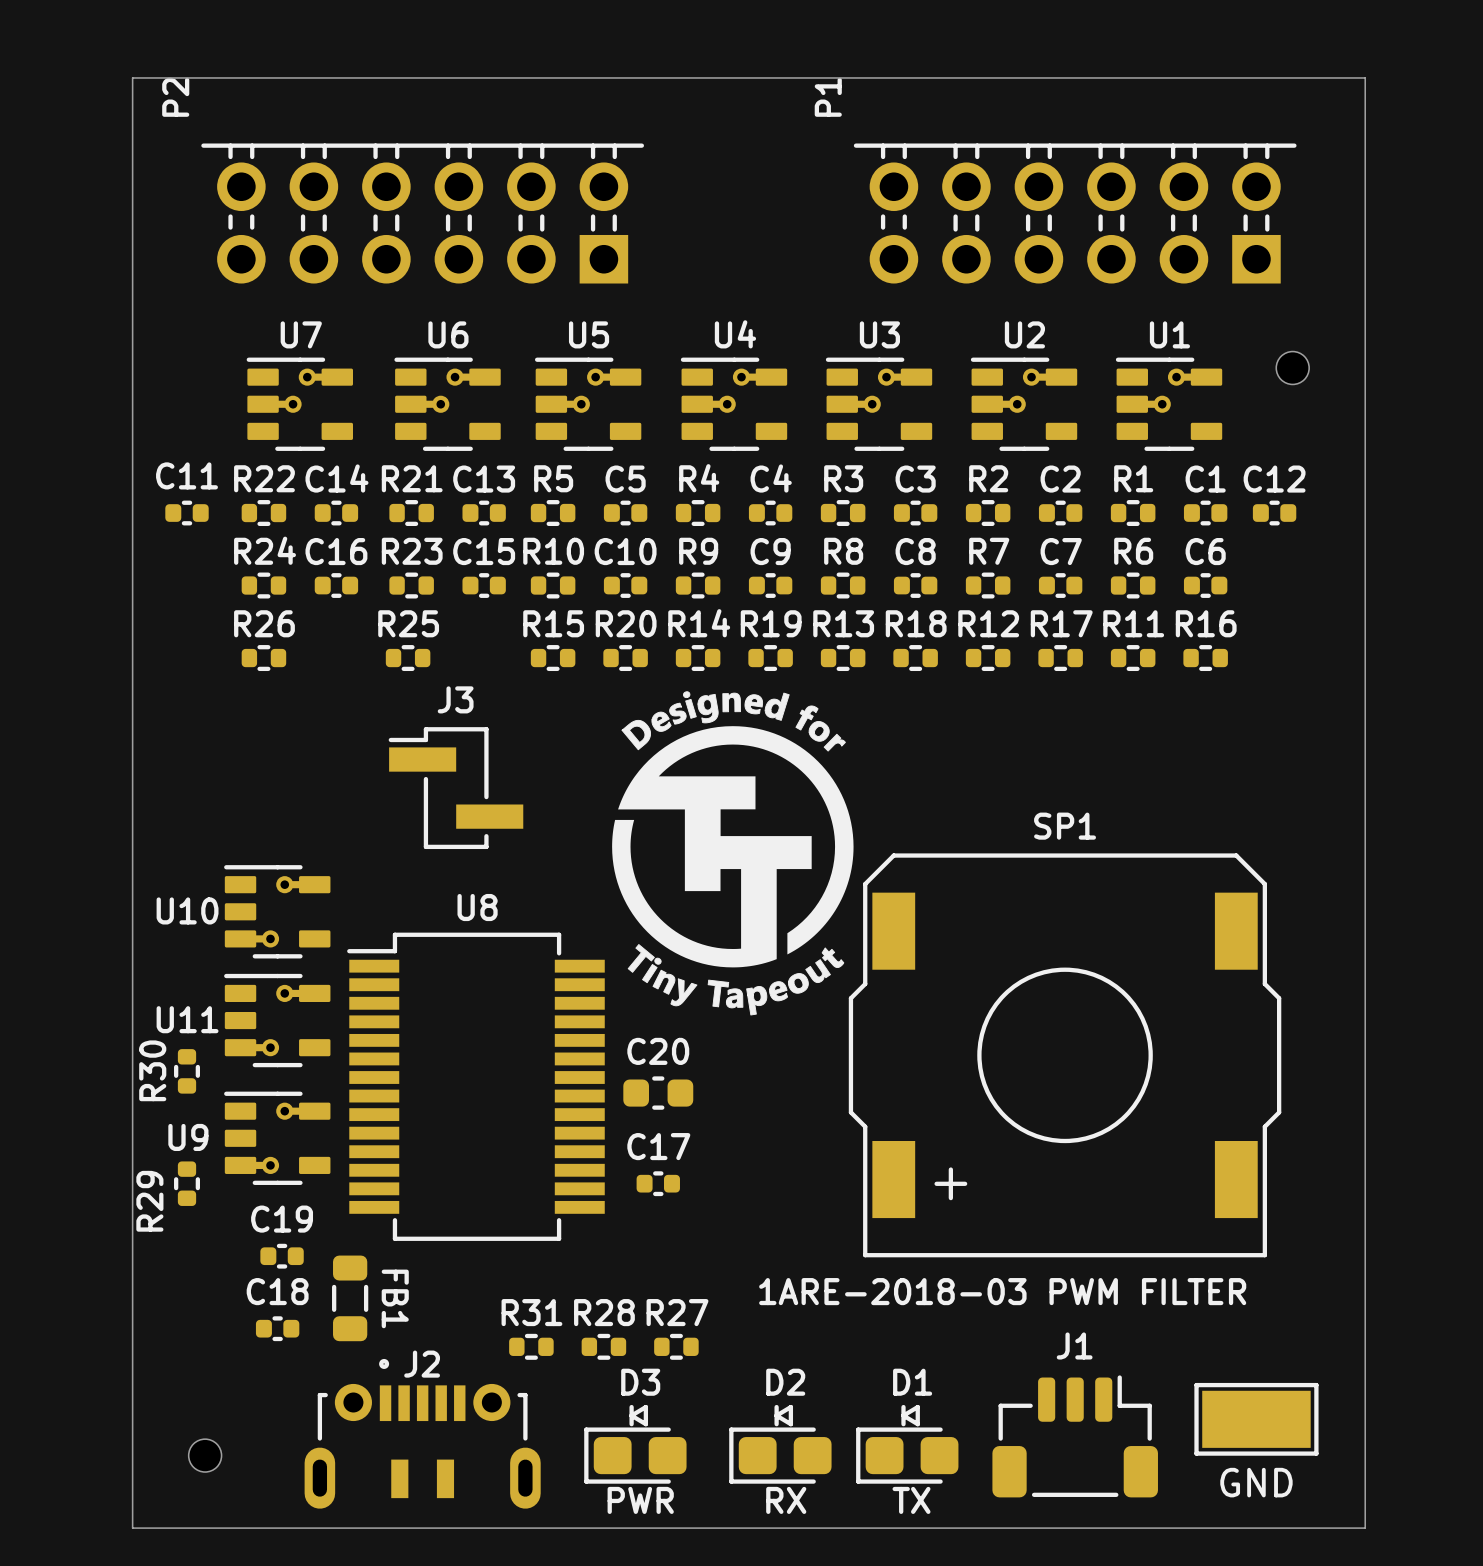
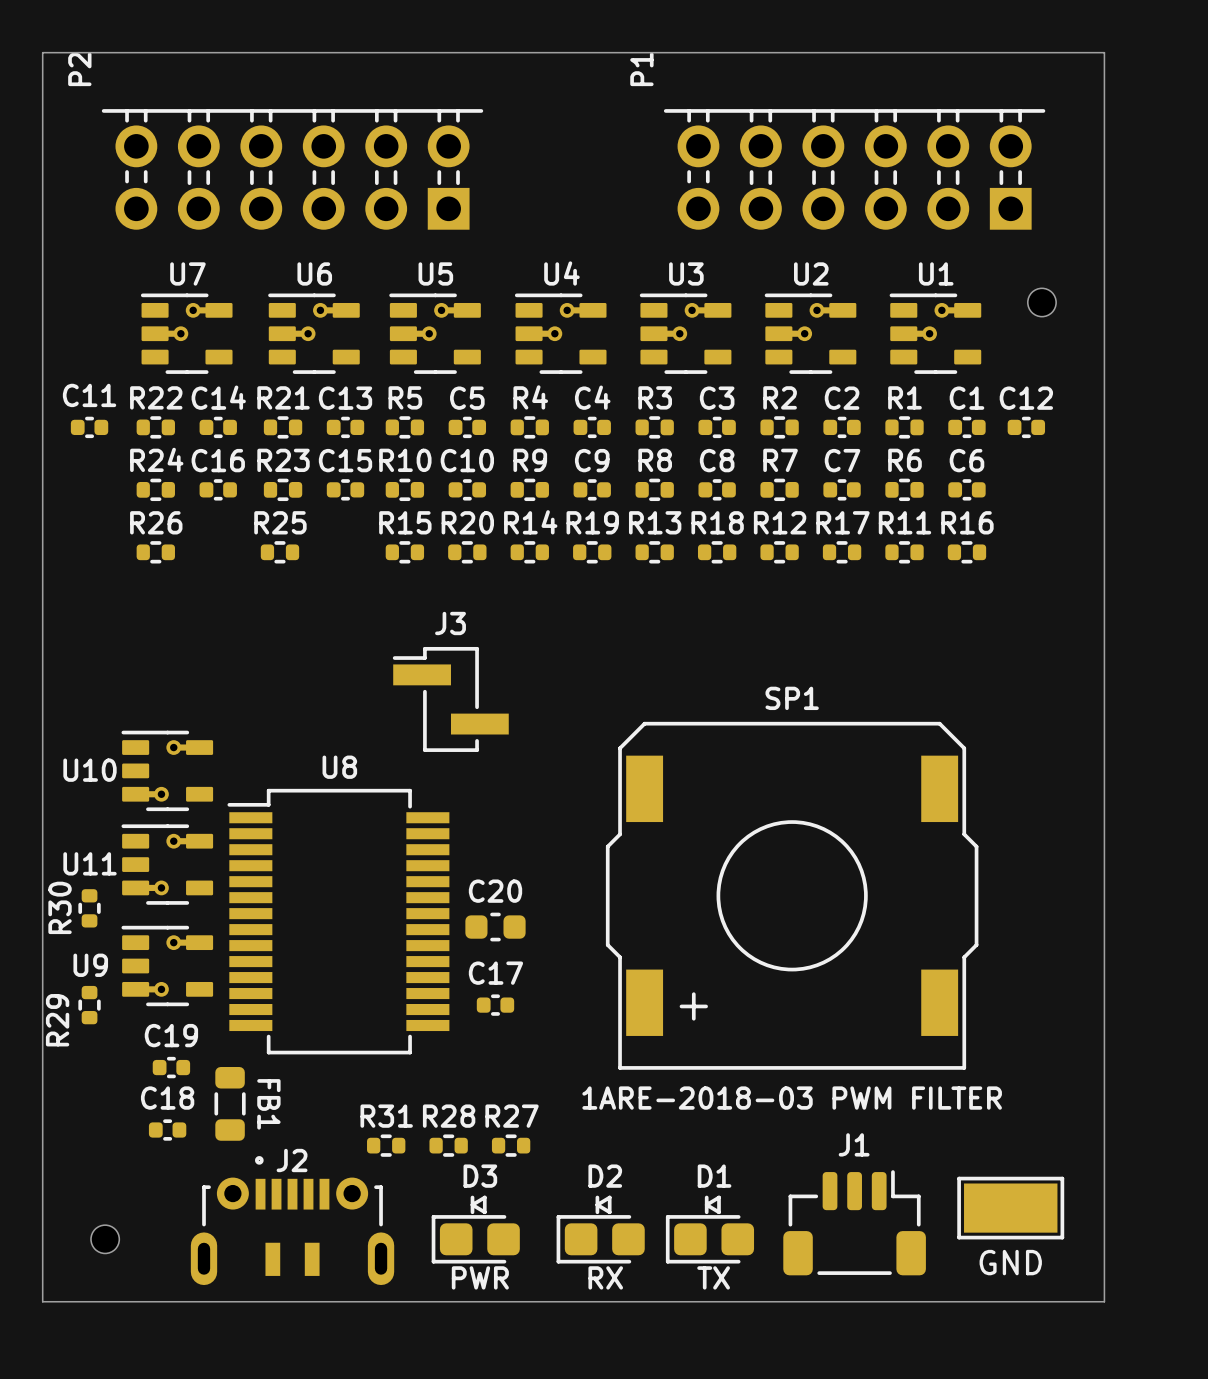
drawing: [612, 691, 854, 1016] -> none
J3 position: (455, 788) -> (450, 699)
SP1 position: (1065, 1055) -> (792, 895)

